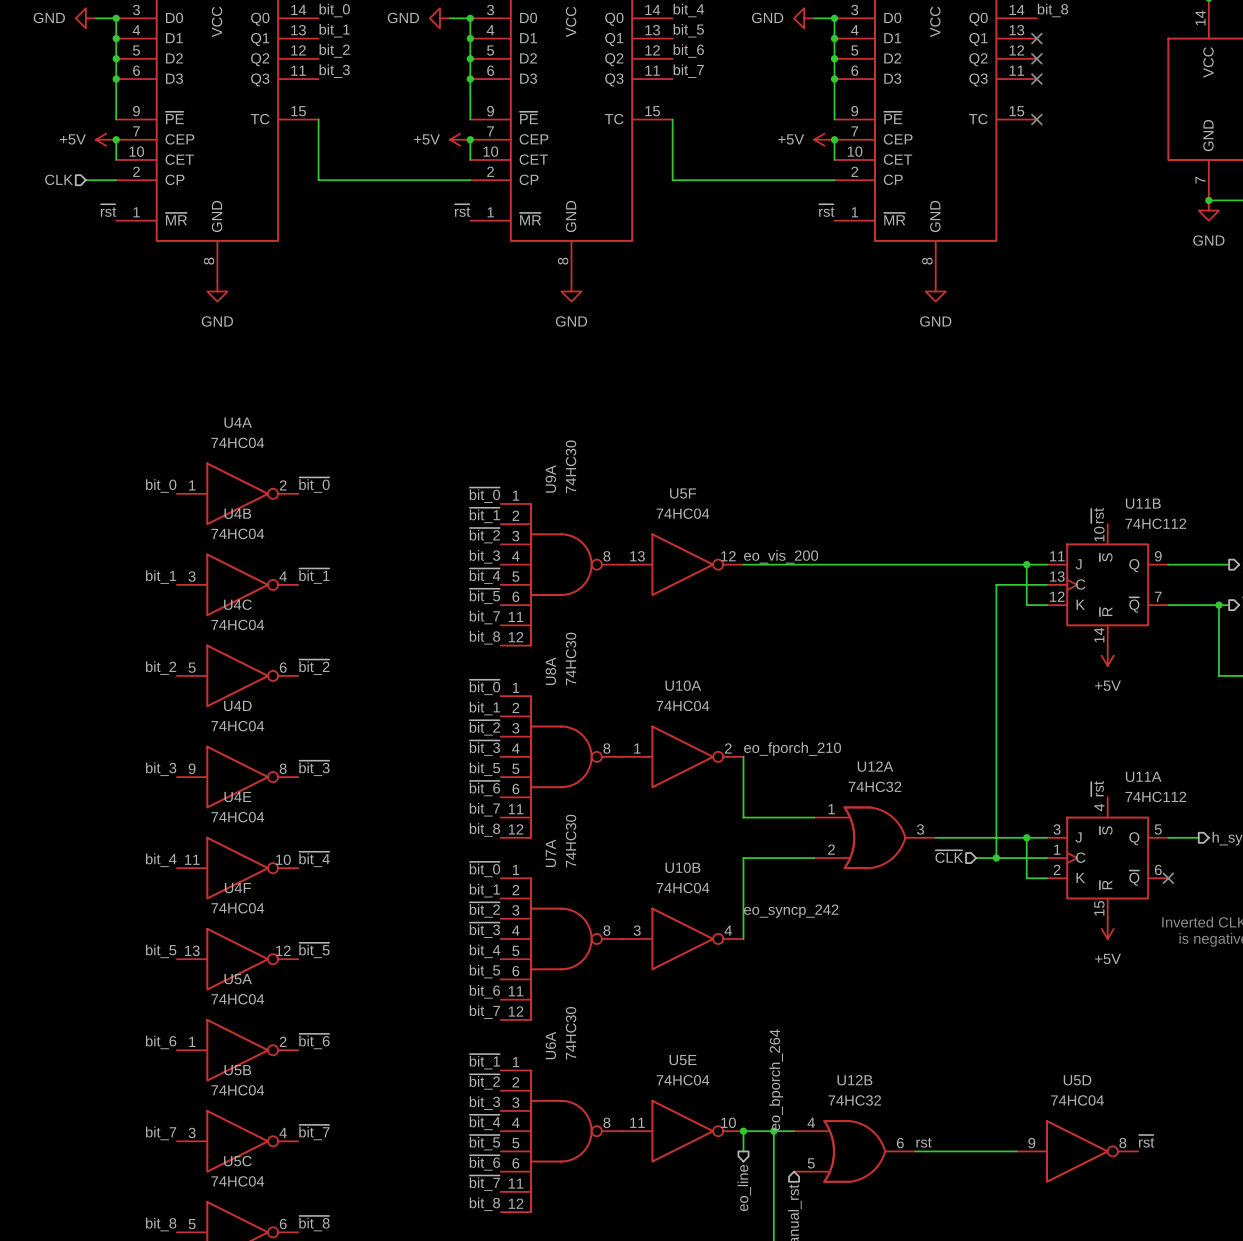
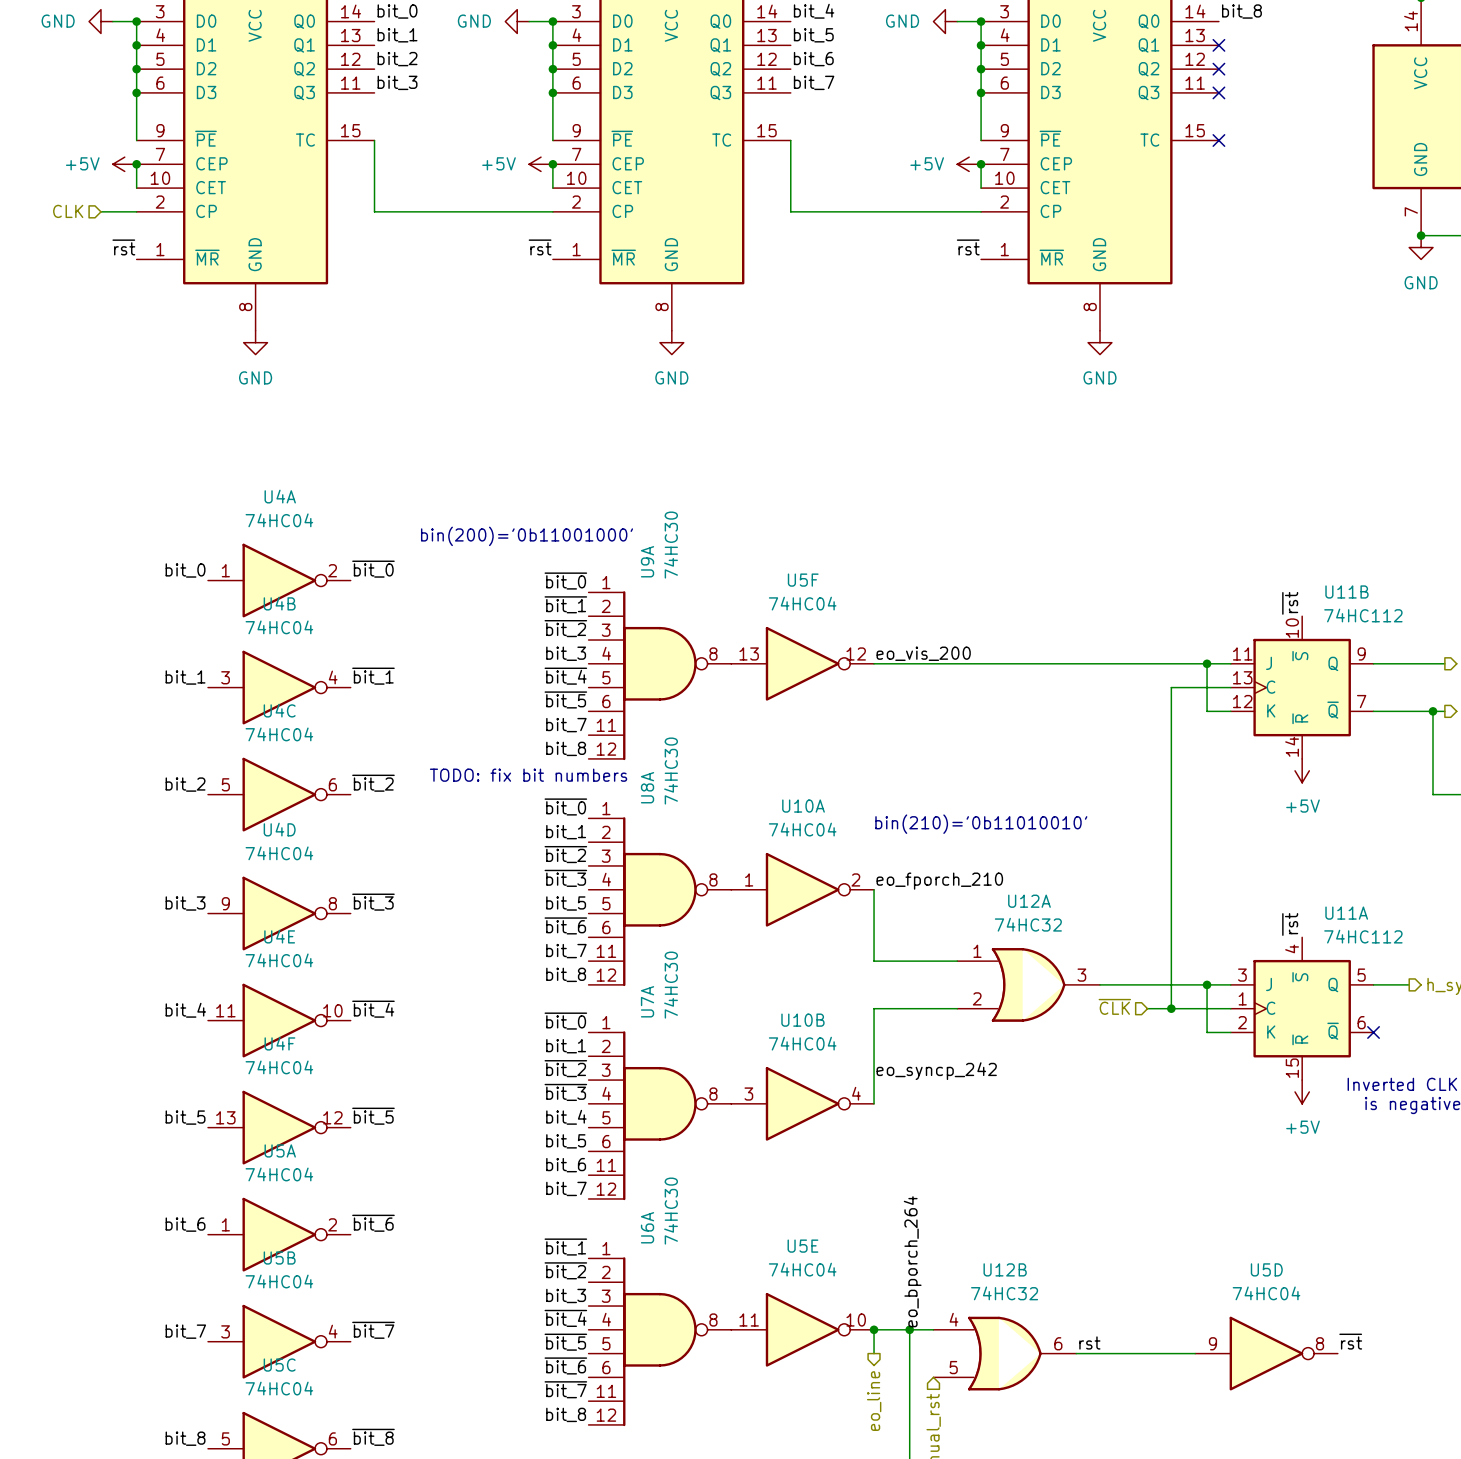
text: none -> bin(200)='0b11001000' (527, 536)
text: none -> TODO: fix bit numbers (528, 775)
text: none -> bin(210)='0b11010010' (981, 824)

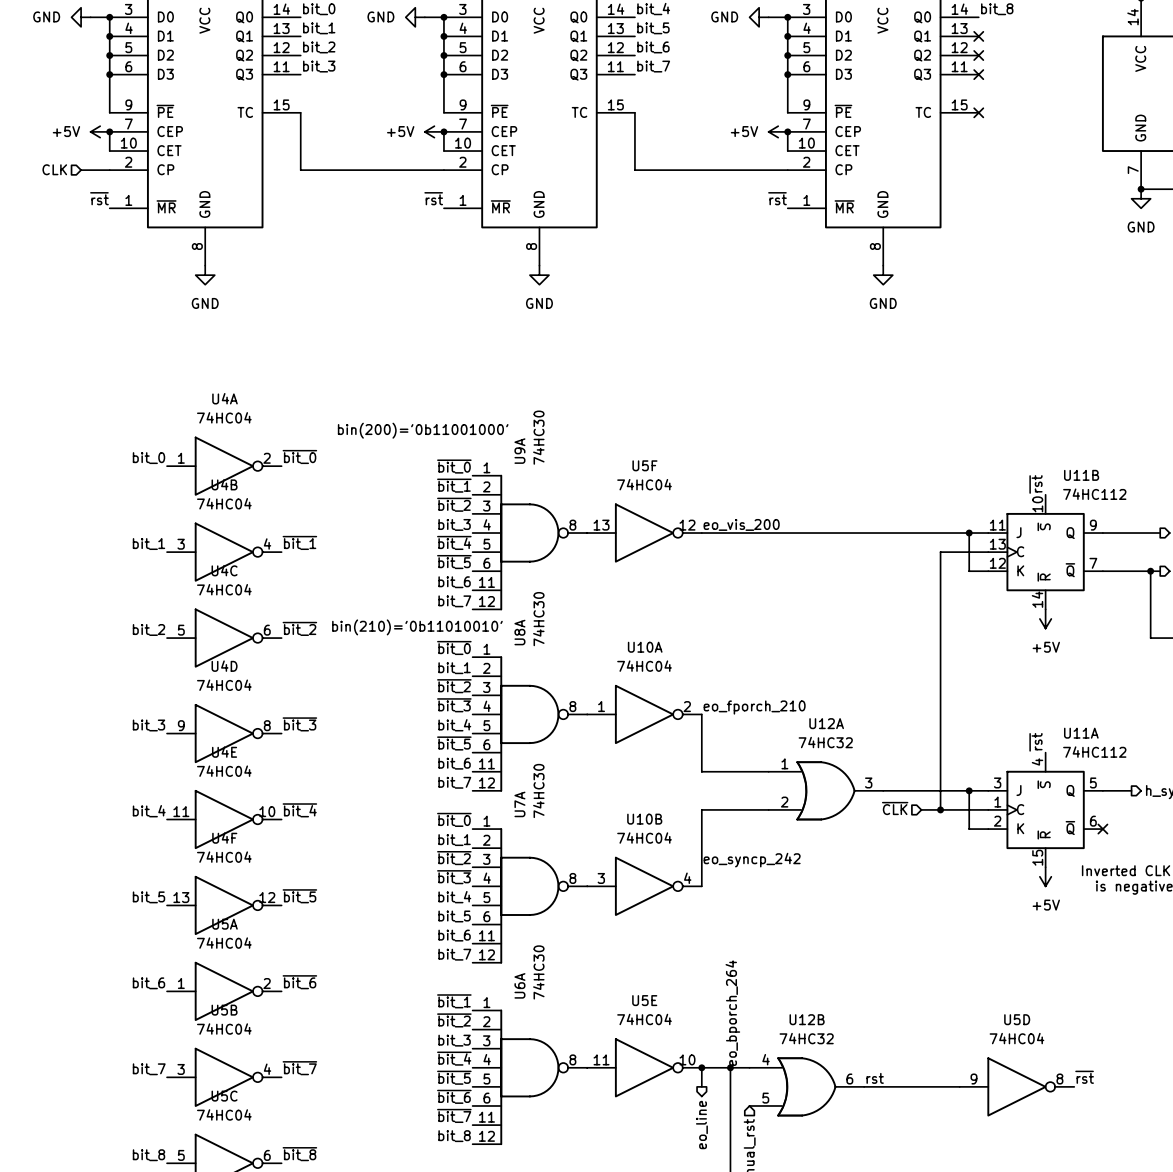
label: bit_7 (566, 725) -> bit_6 (454, 582)
label: bit_8 (566, 748) -> bit_7 (454, 601)
text: TODO: fix bit numbers (528, 775) -> none
text: none -> bin(210)='0b11010010' (417, 627)
text: bin(210)='0b11010010' (981, 824) -> none
label: bit_5 (566, 903) -> bit_4 (454, 725)
label: ~{bit_6} (565, 925) -> ~{bit_5} (454, 743)
label: bit_7 (566, 951) -> bit_6 (454, 763)
label: bit_8 (566, 974) -> bit_7 (454, 782)

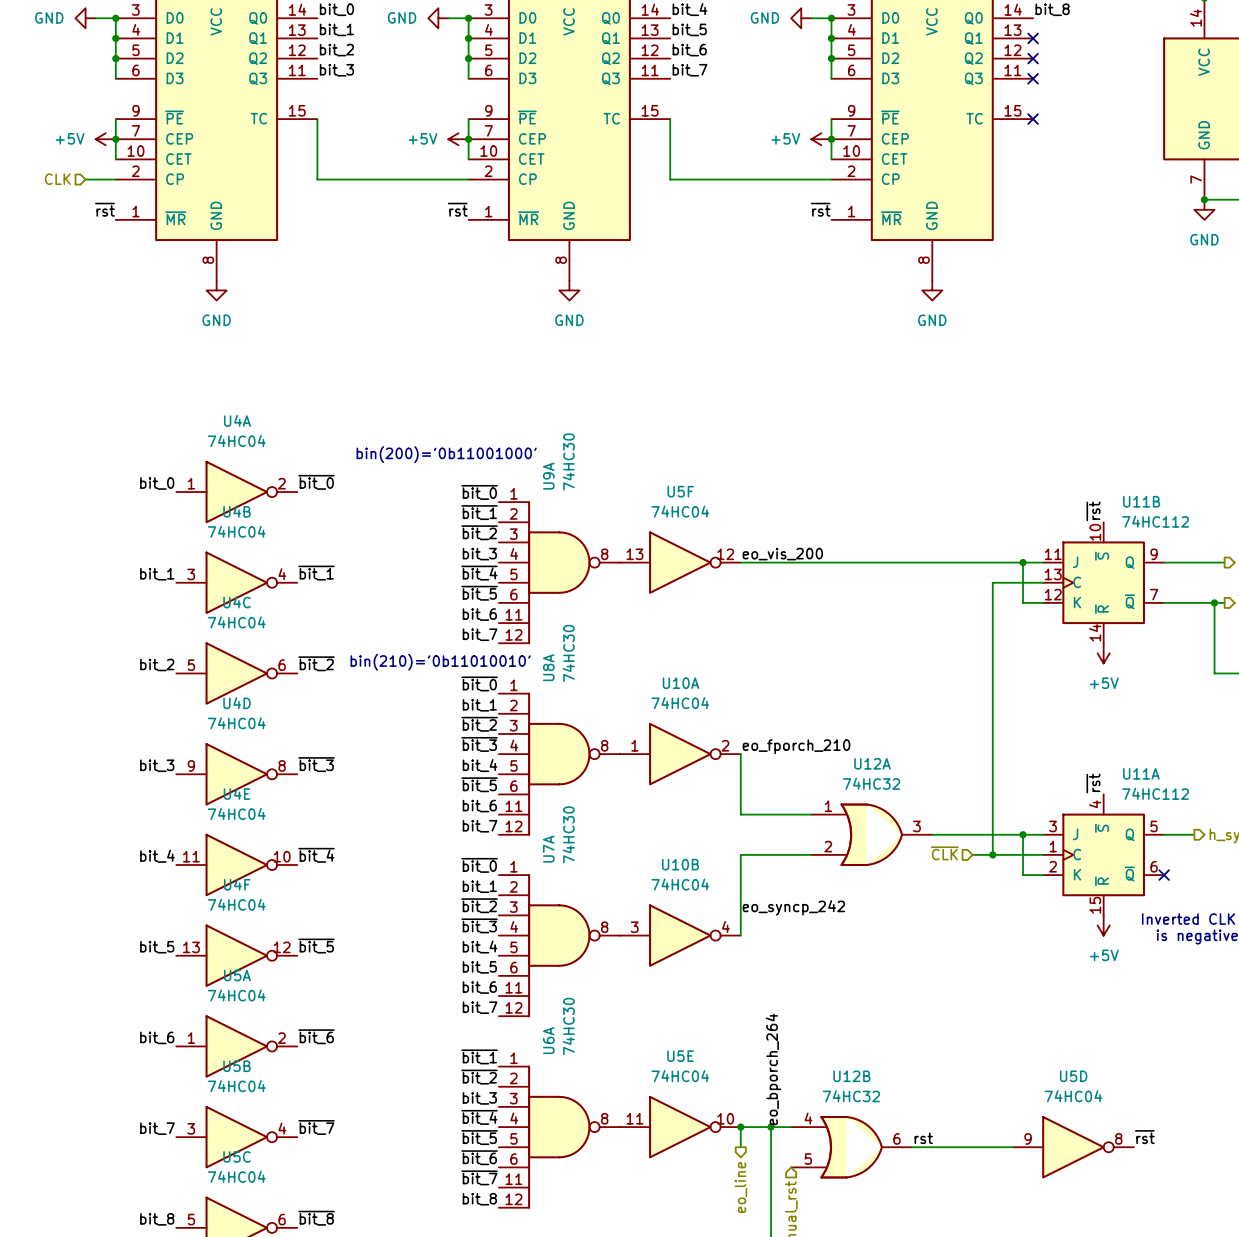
wire: (109, 74) (109, 112) -> (115, 139) (115, 119)
junction: (109, 74) -> none
wire: (443, 74) (443, 112) -> (468, 139) (468, 119)
junction: (443, 74) -> none
wire: (787, 74) (787, 112) -> (831, 139) (831, 119)
junction: (787, 74) -> none

